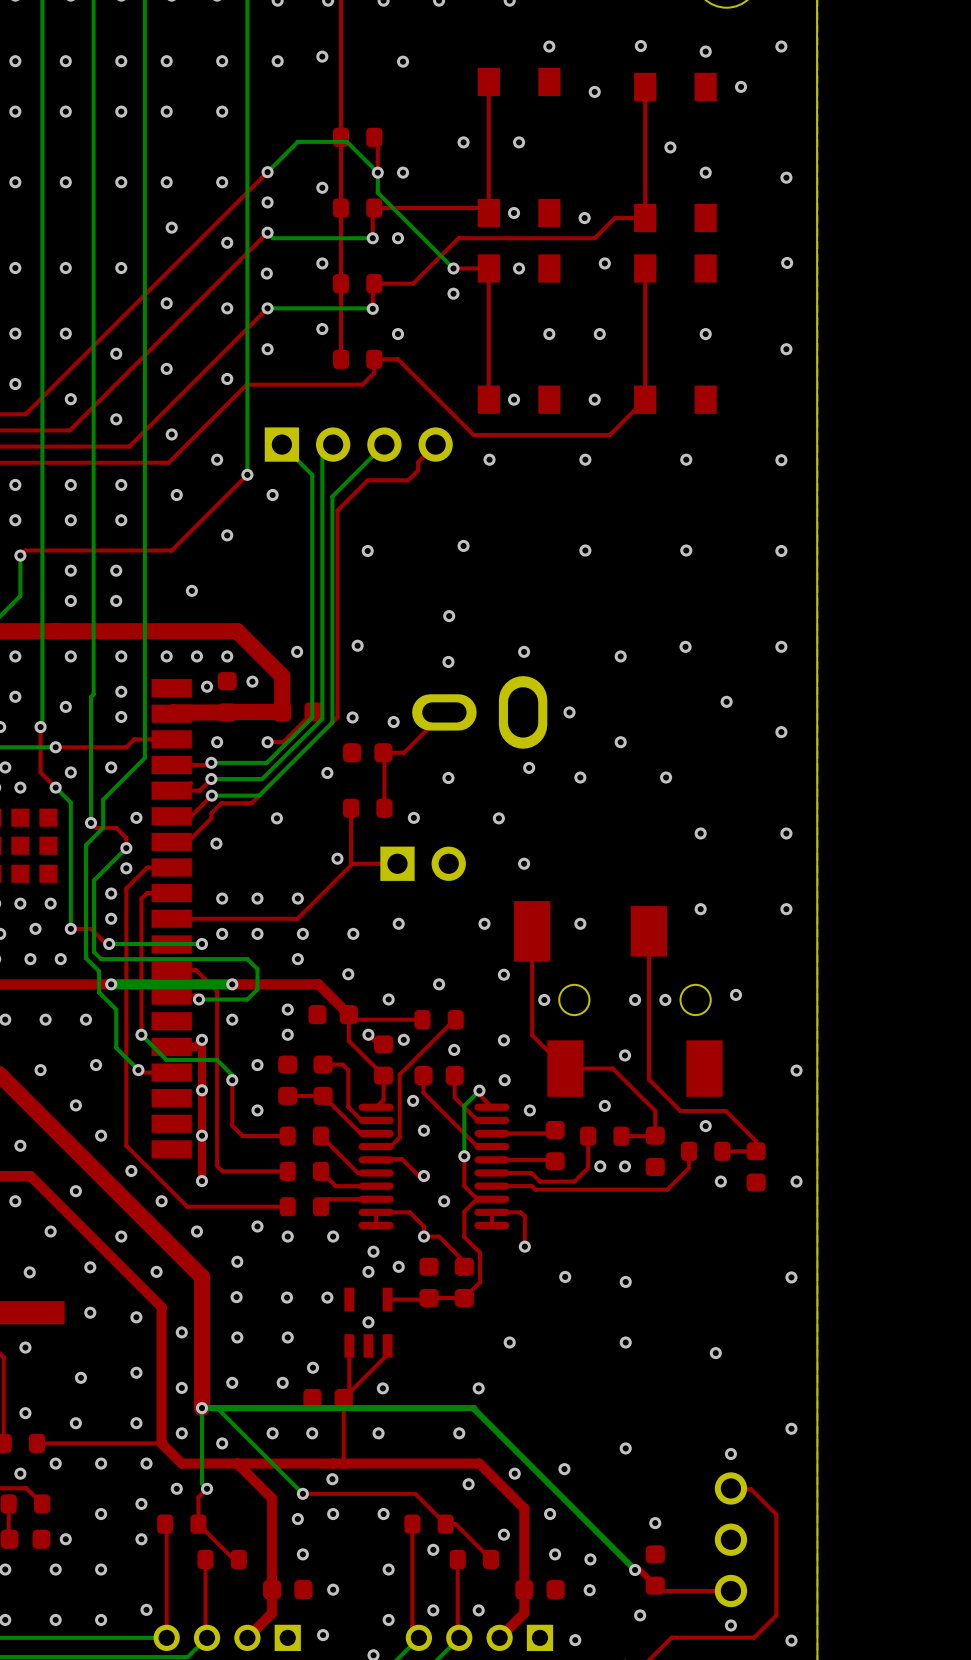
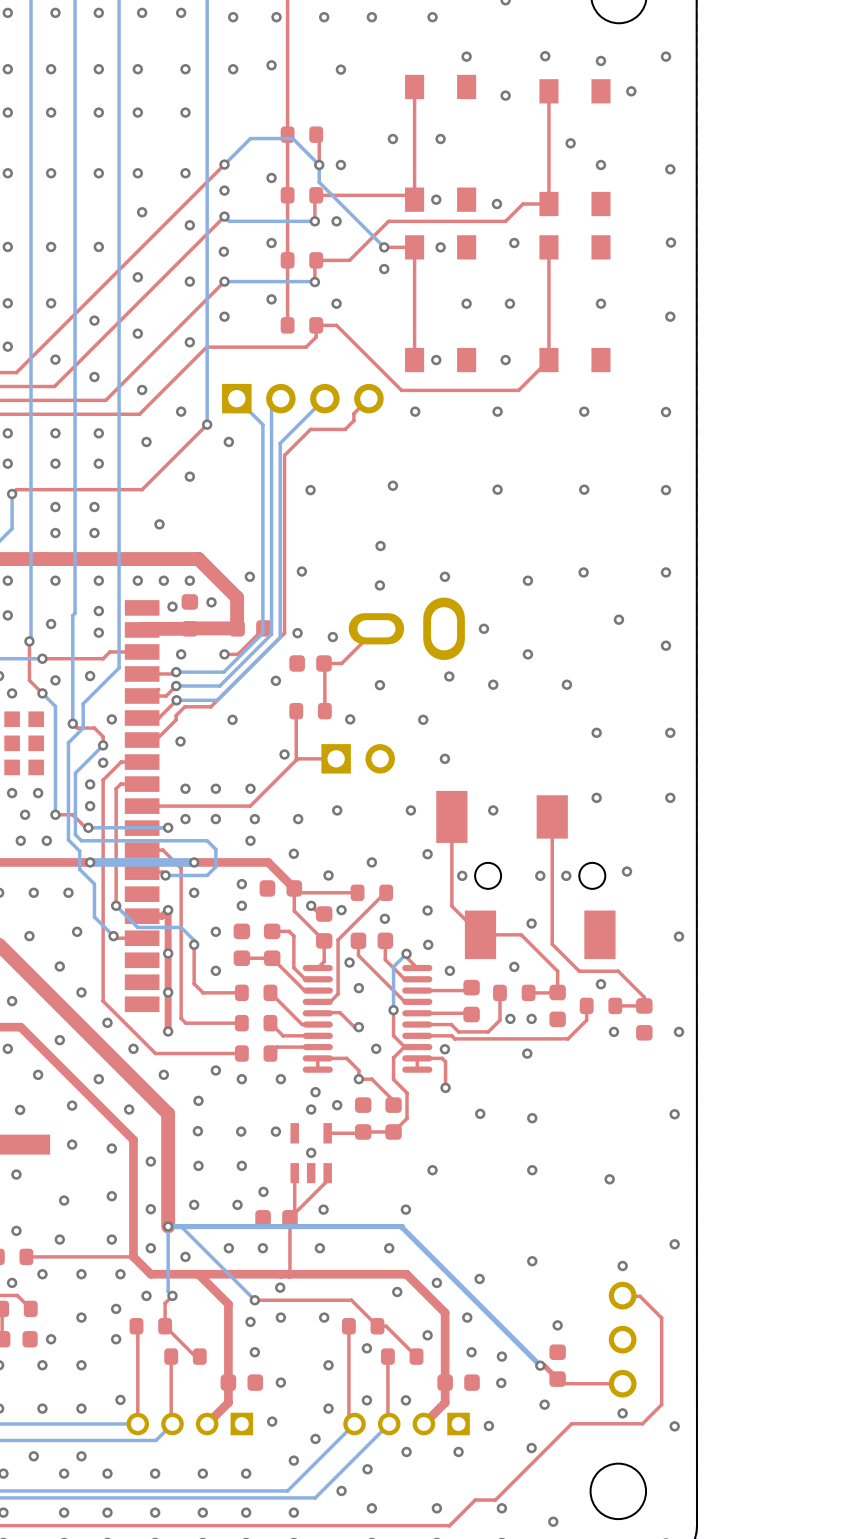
via: none -> (444, 1049)
via: none -> (527, 1053)

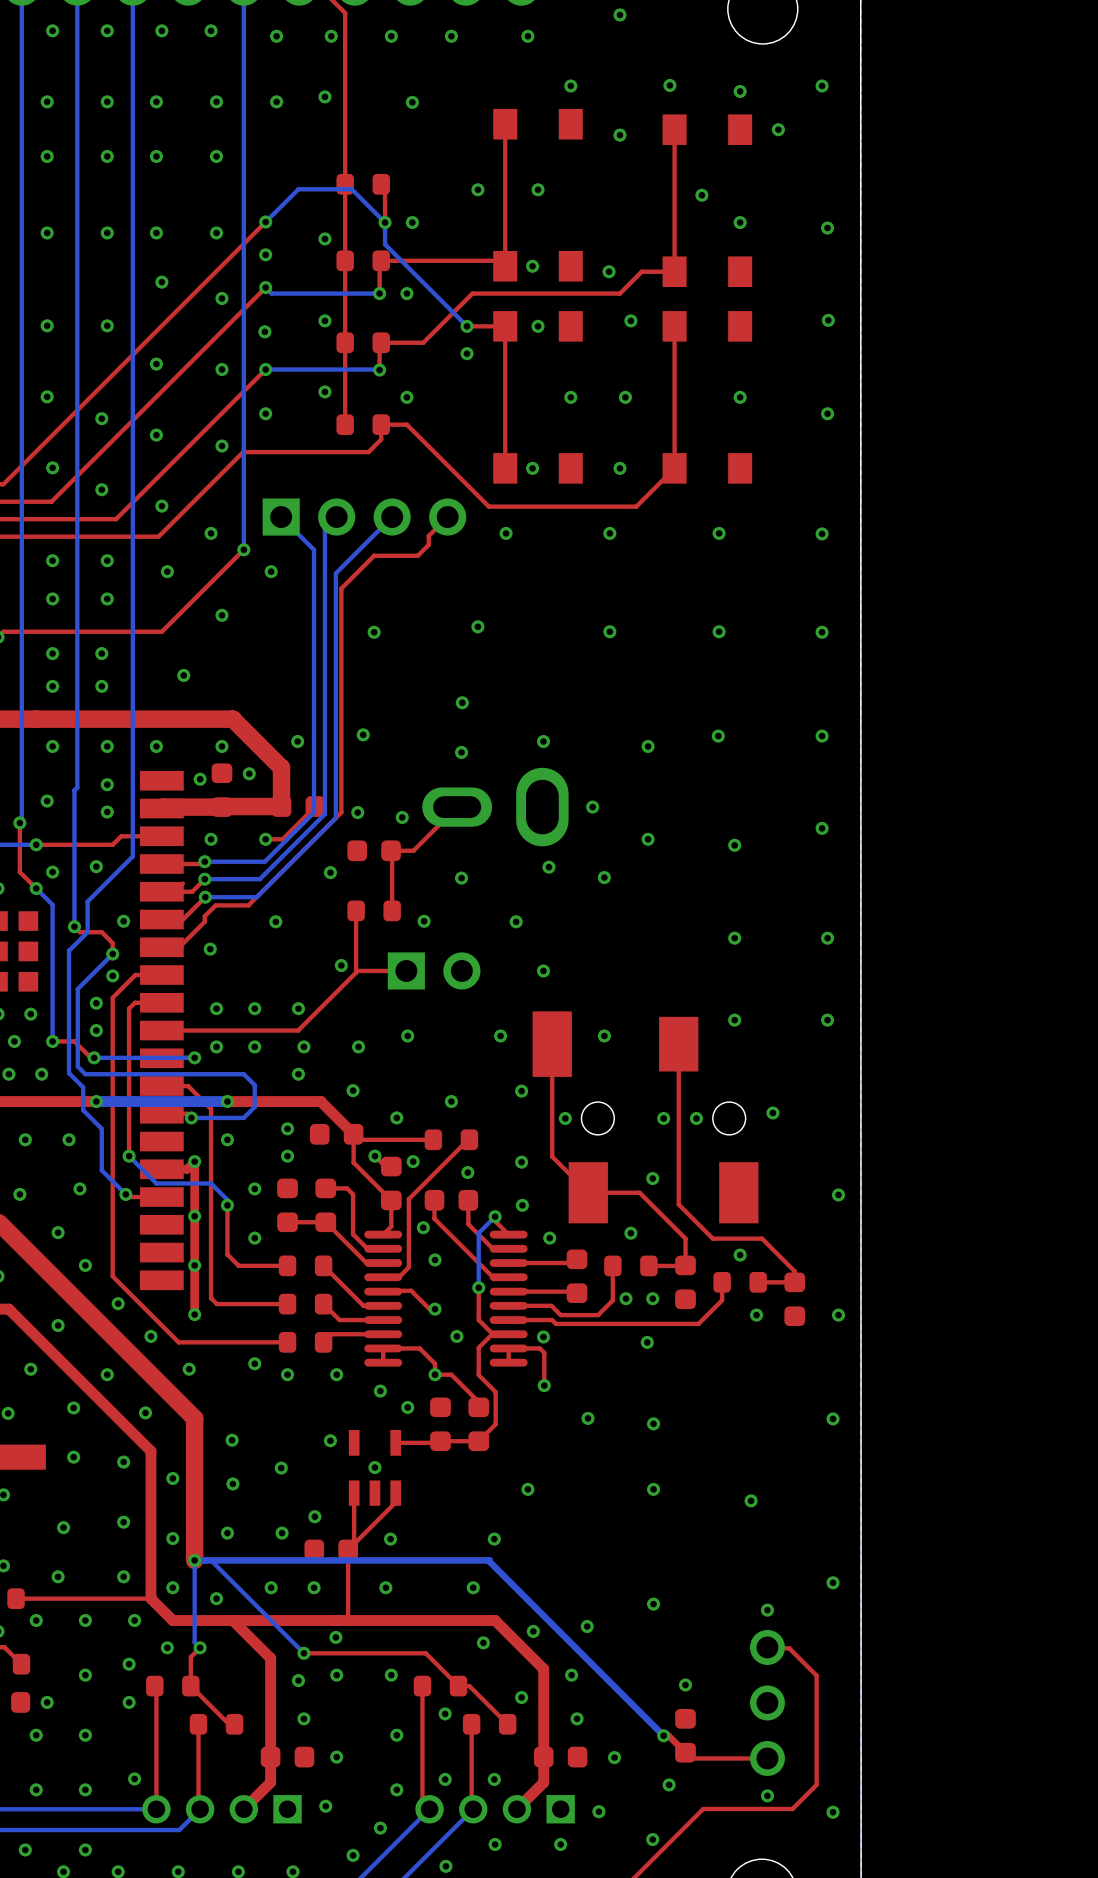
via: (163, 580) -> none
via: (618, 619) -> none
via: none -> (734, 845)
via: (566, 684) -> none
via: (198, 1100) -> none
via: (311, 1109) -> none
via: (241, 1131) -> none
via: none -> (281, 1468)
via: (241, 1165) -> none
via: (501, 1356) -> none

